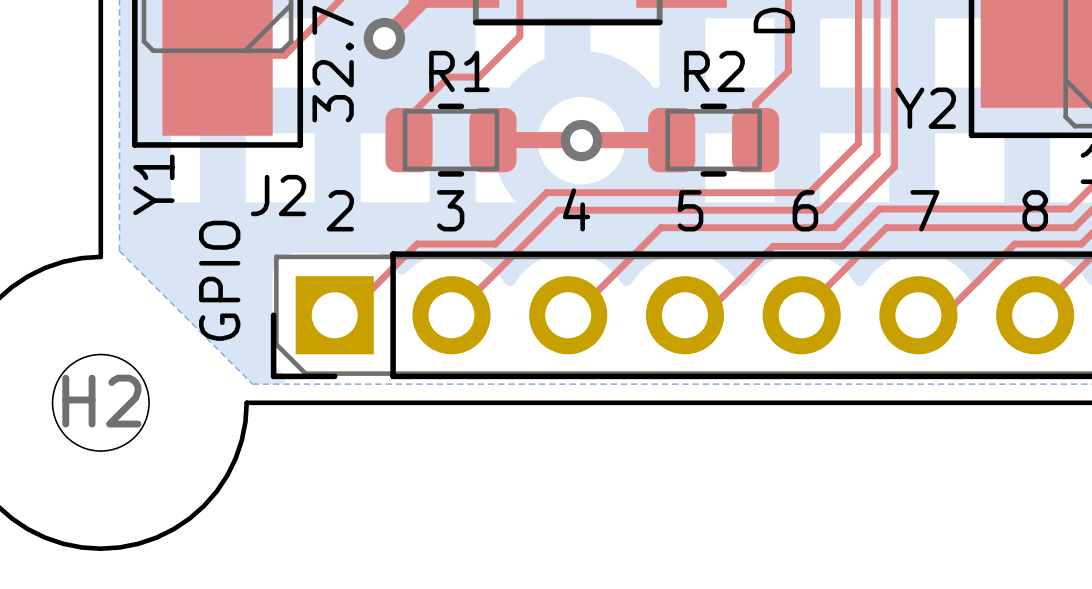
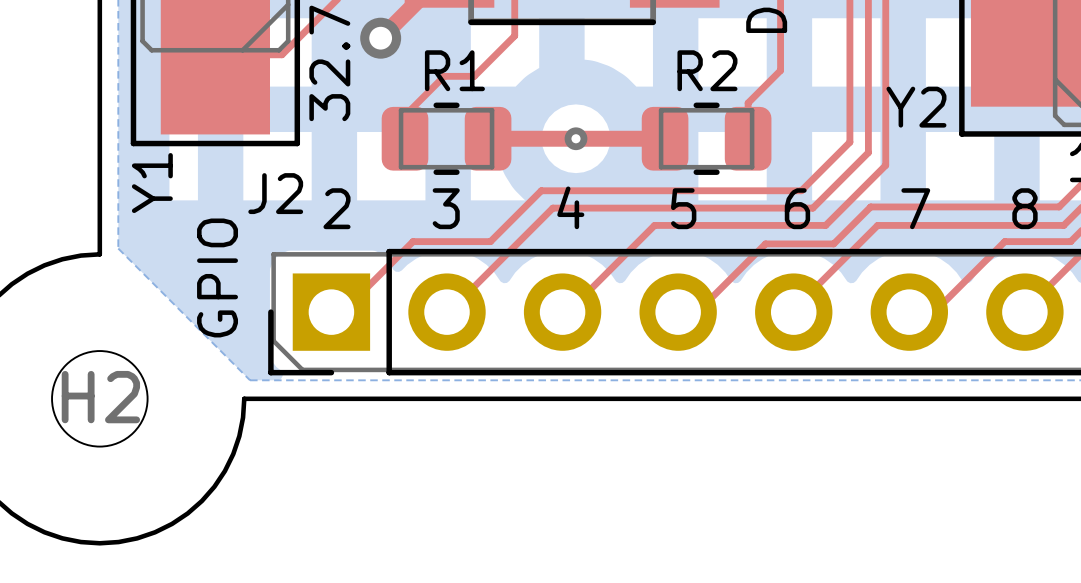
via size: [560, 119, 603, 162] -> [564, 127, 588, 151]

